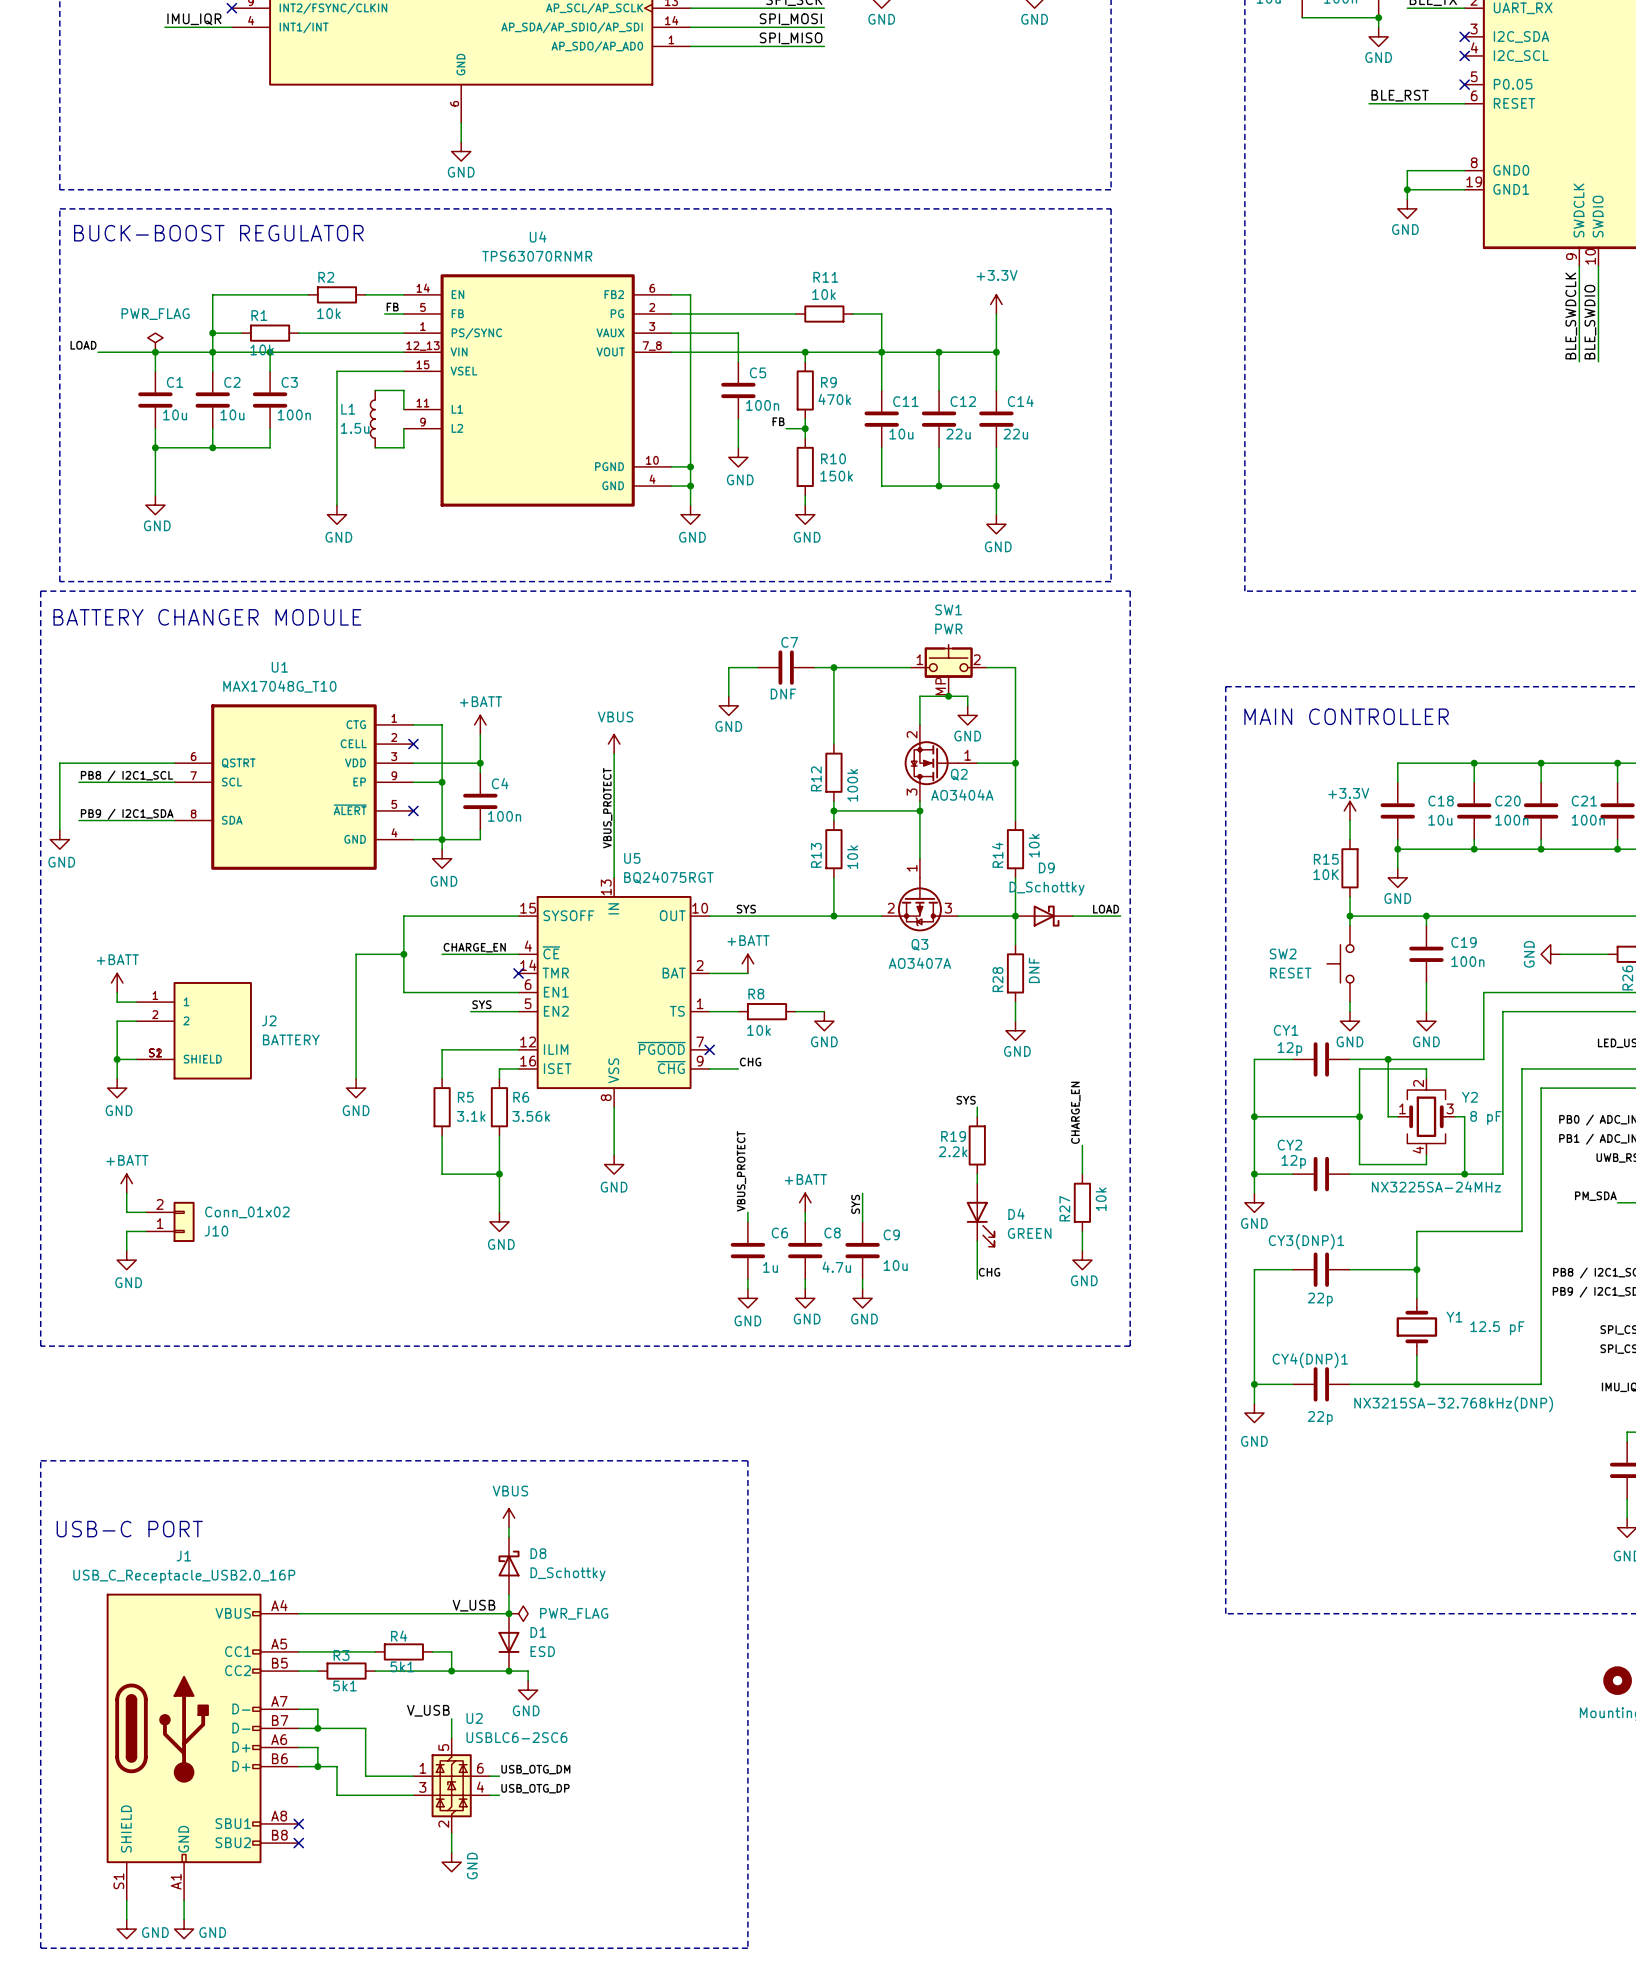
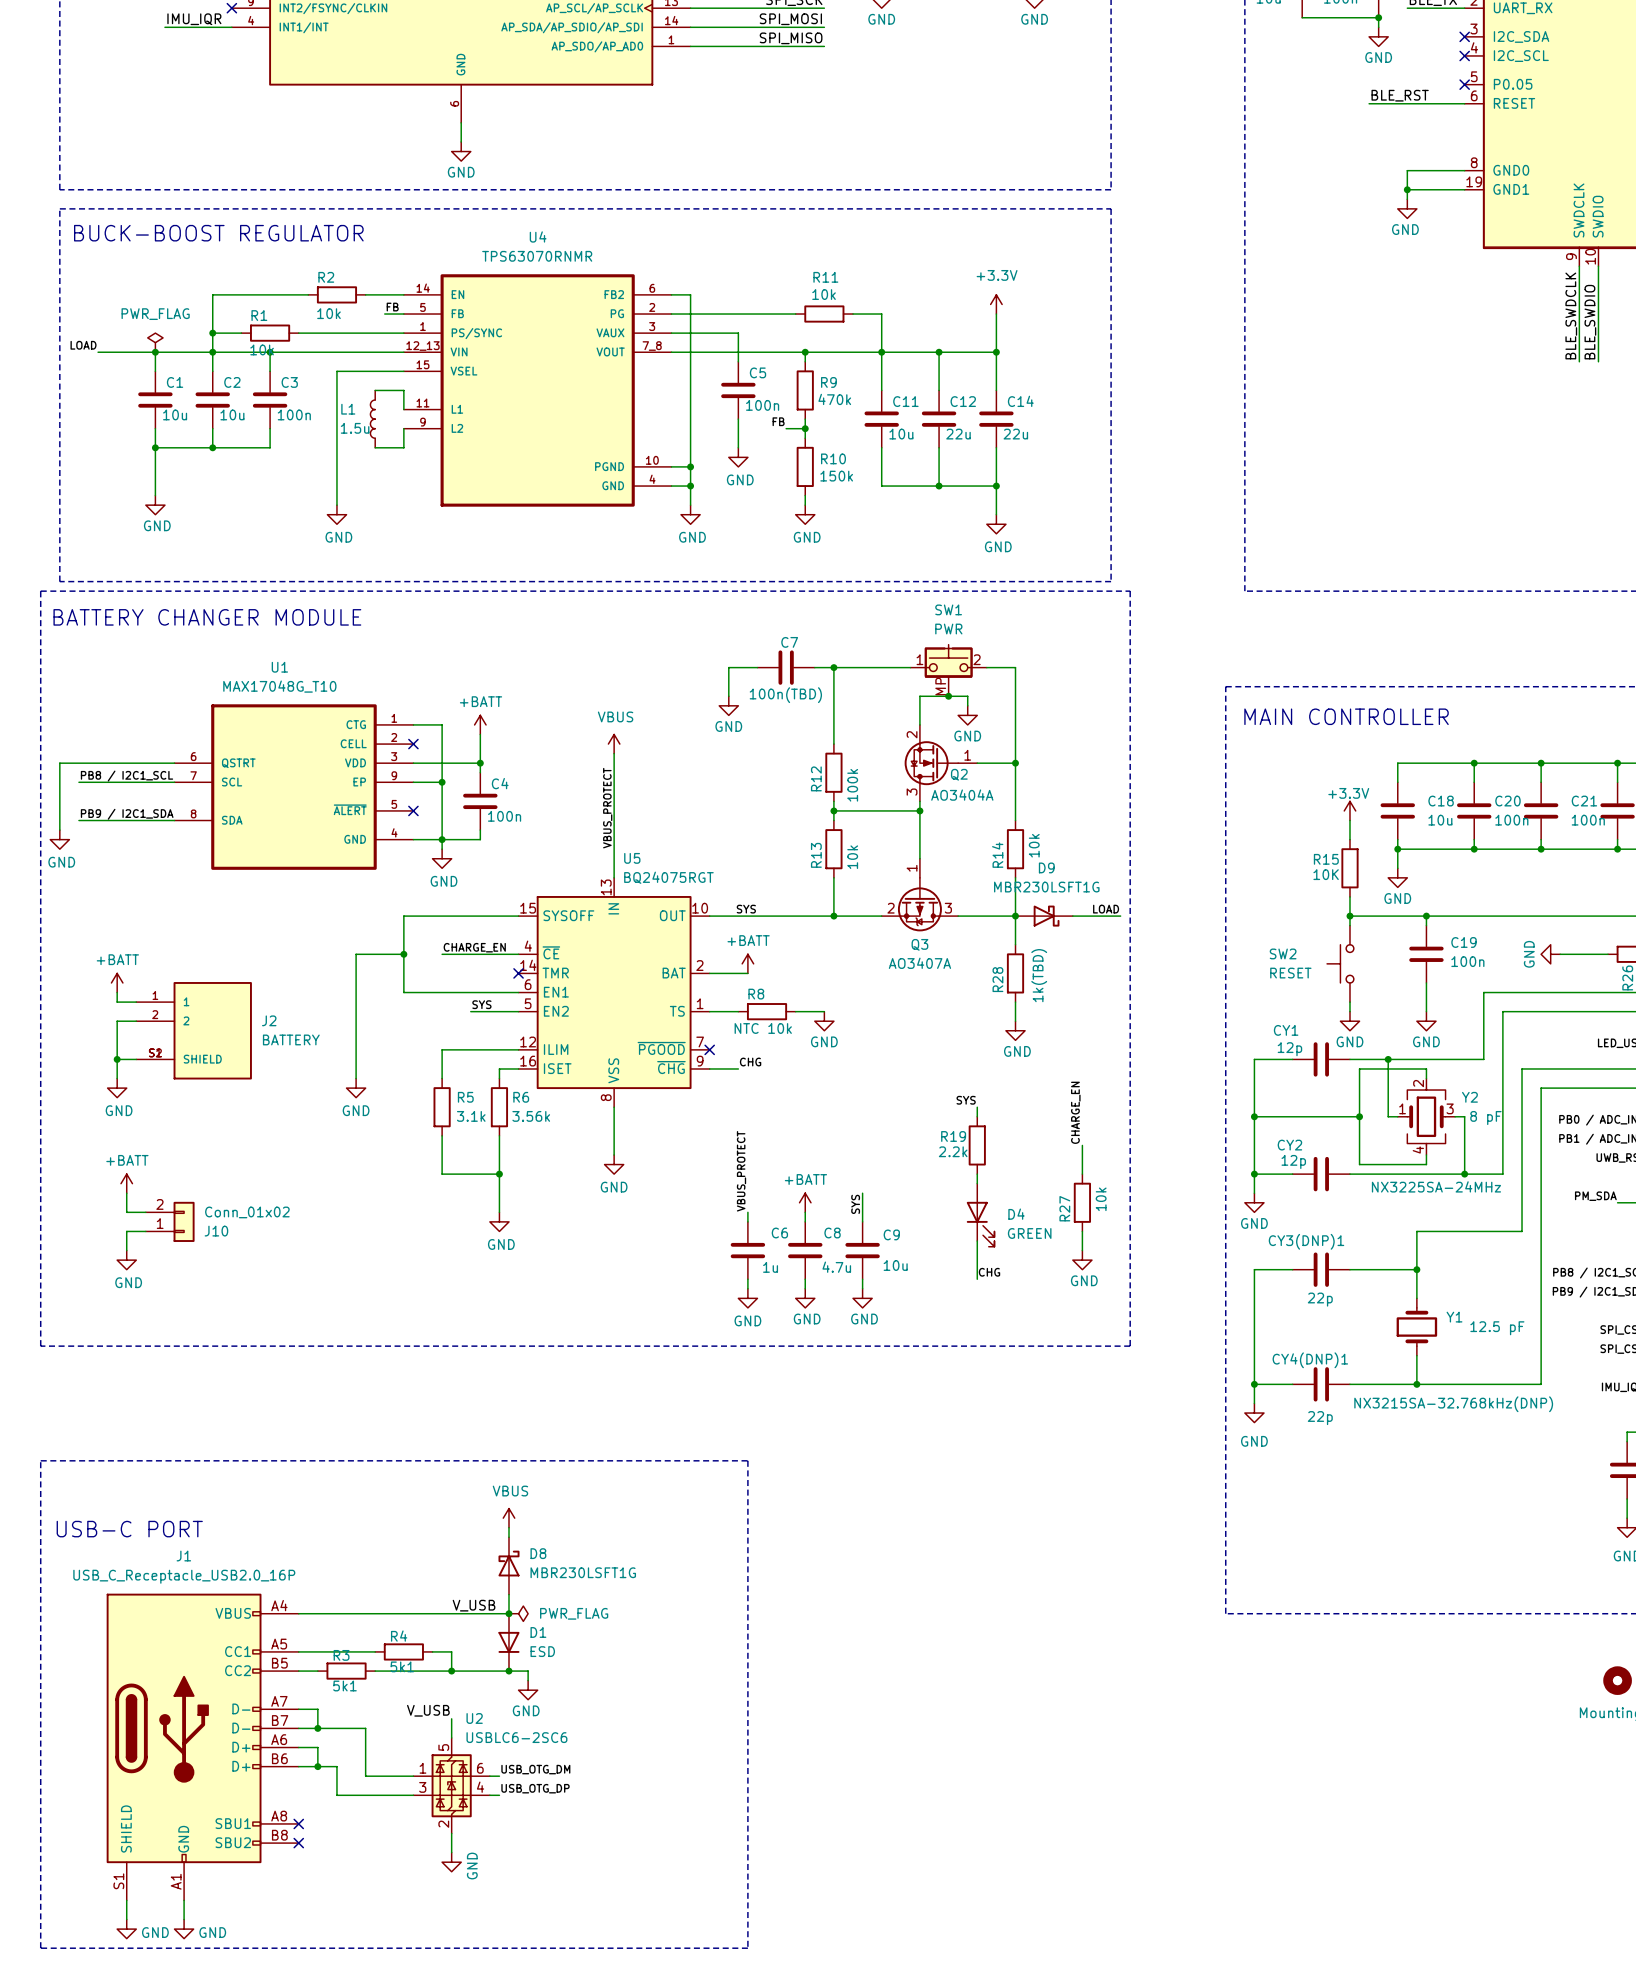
C7 value: DNF (783, 694) -> 100n(TBD) (785, 695)
D9 value: D_Schottky (1047, 888) -> MBR230LSFT1G (1046, 887)
R28 value: DNF (1034, 970) -> 1k(TBD) (1039, 975)
R8 value: 10k (759, 1030) -> NTC 10k (763, 1028)
D8 value: D_Schottky (568, 1574) -> MBR230LSFT1G (583, 1572)

